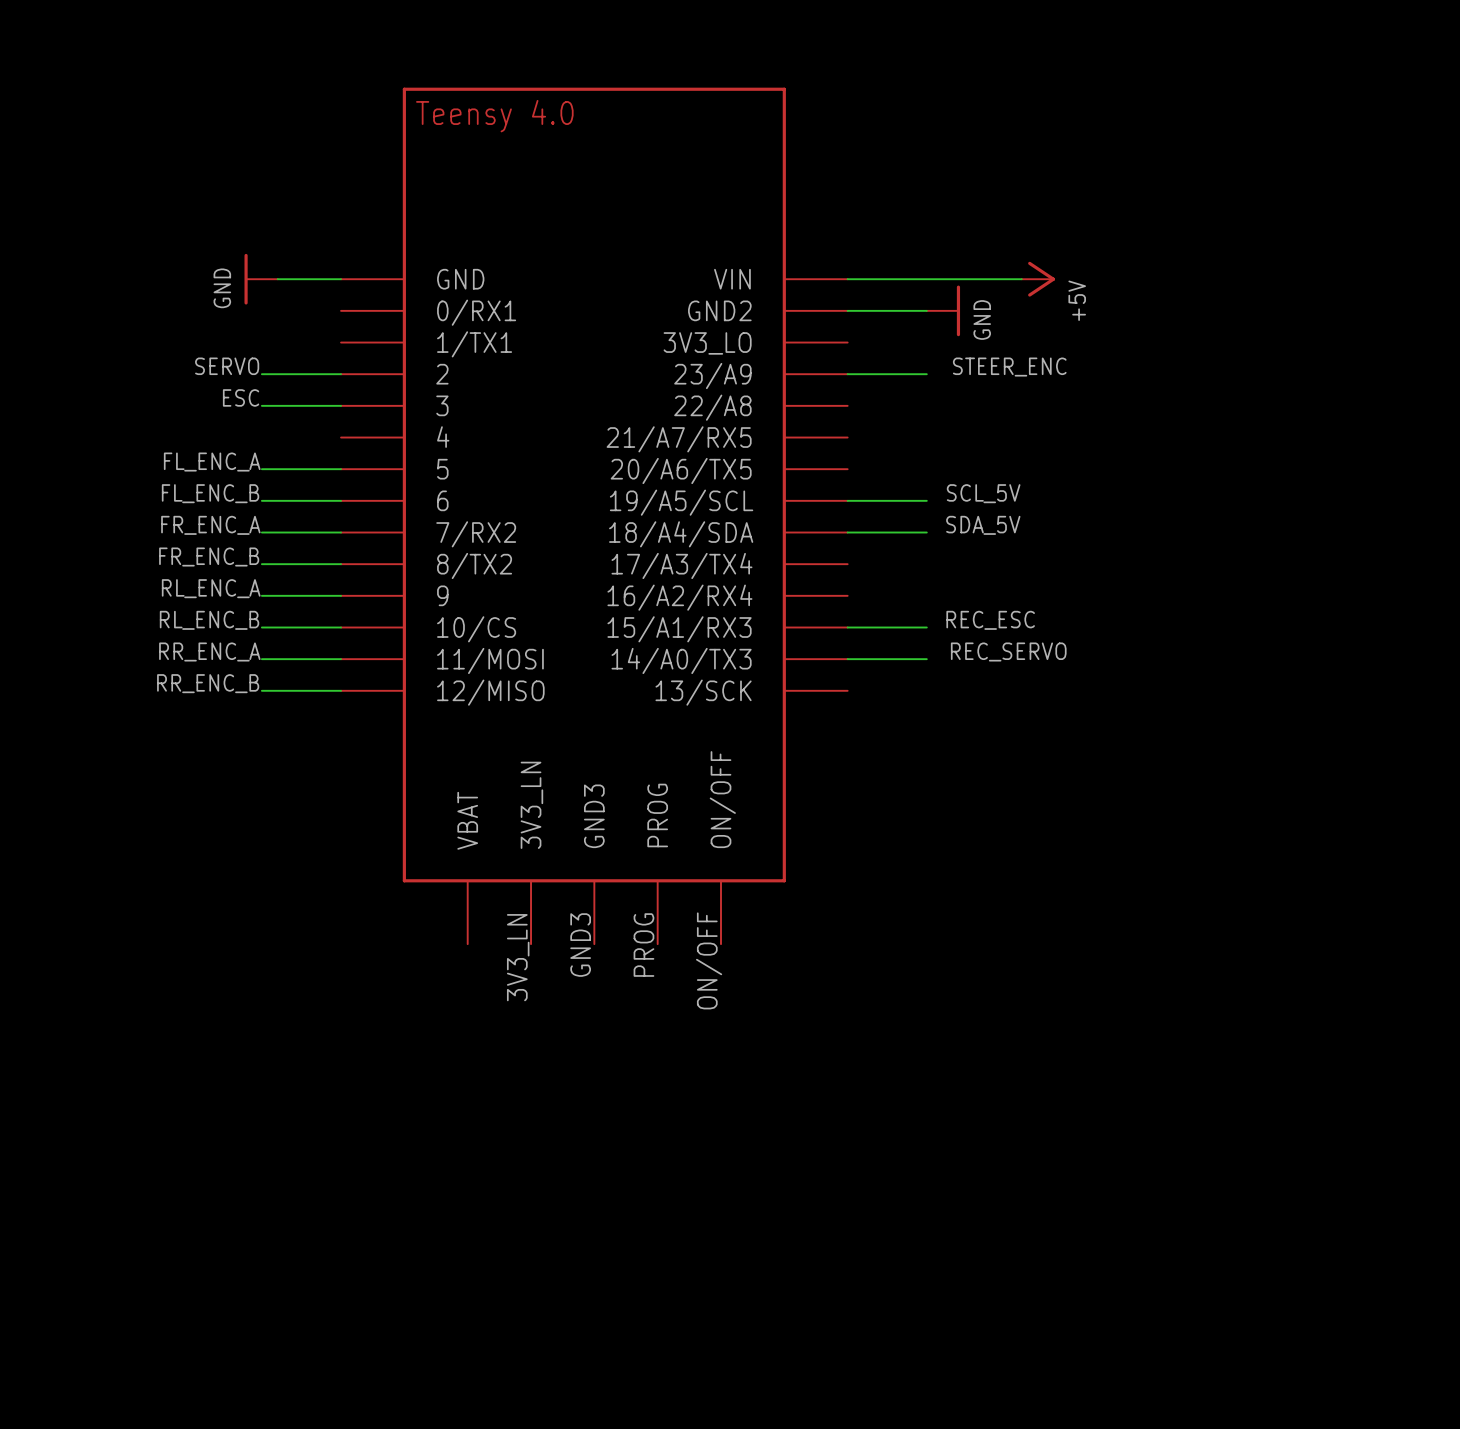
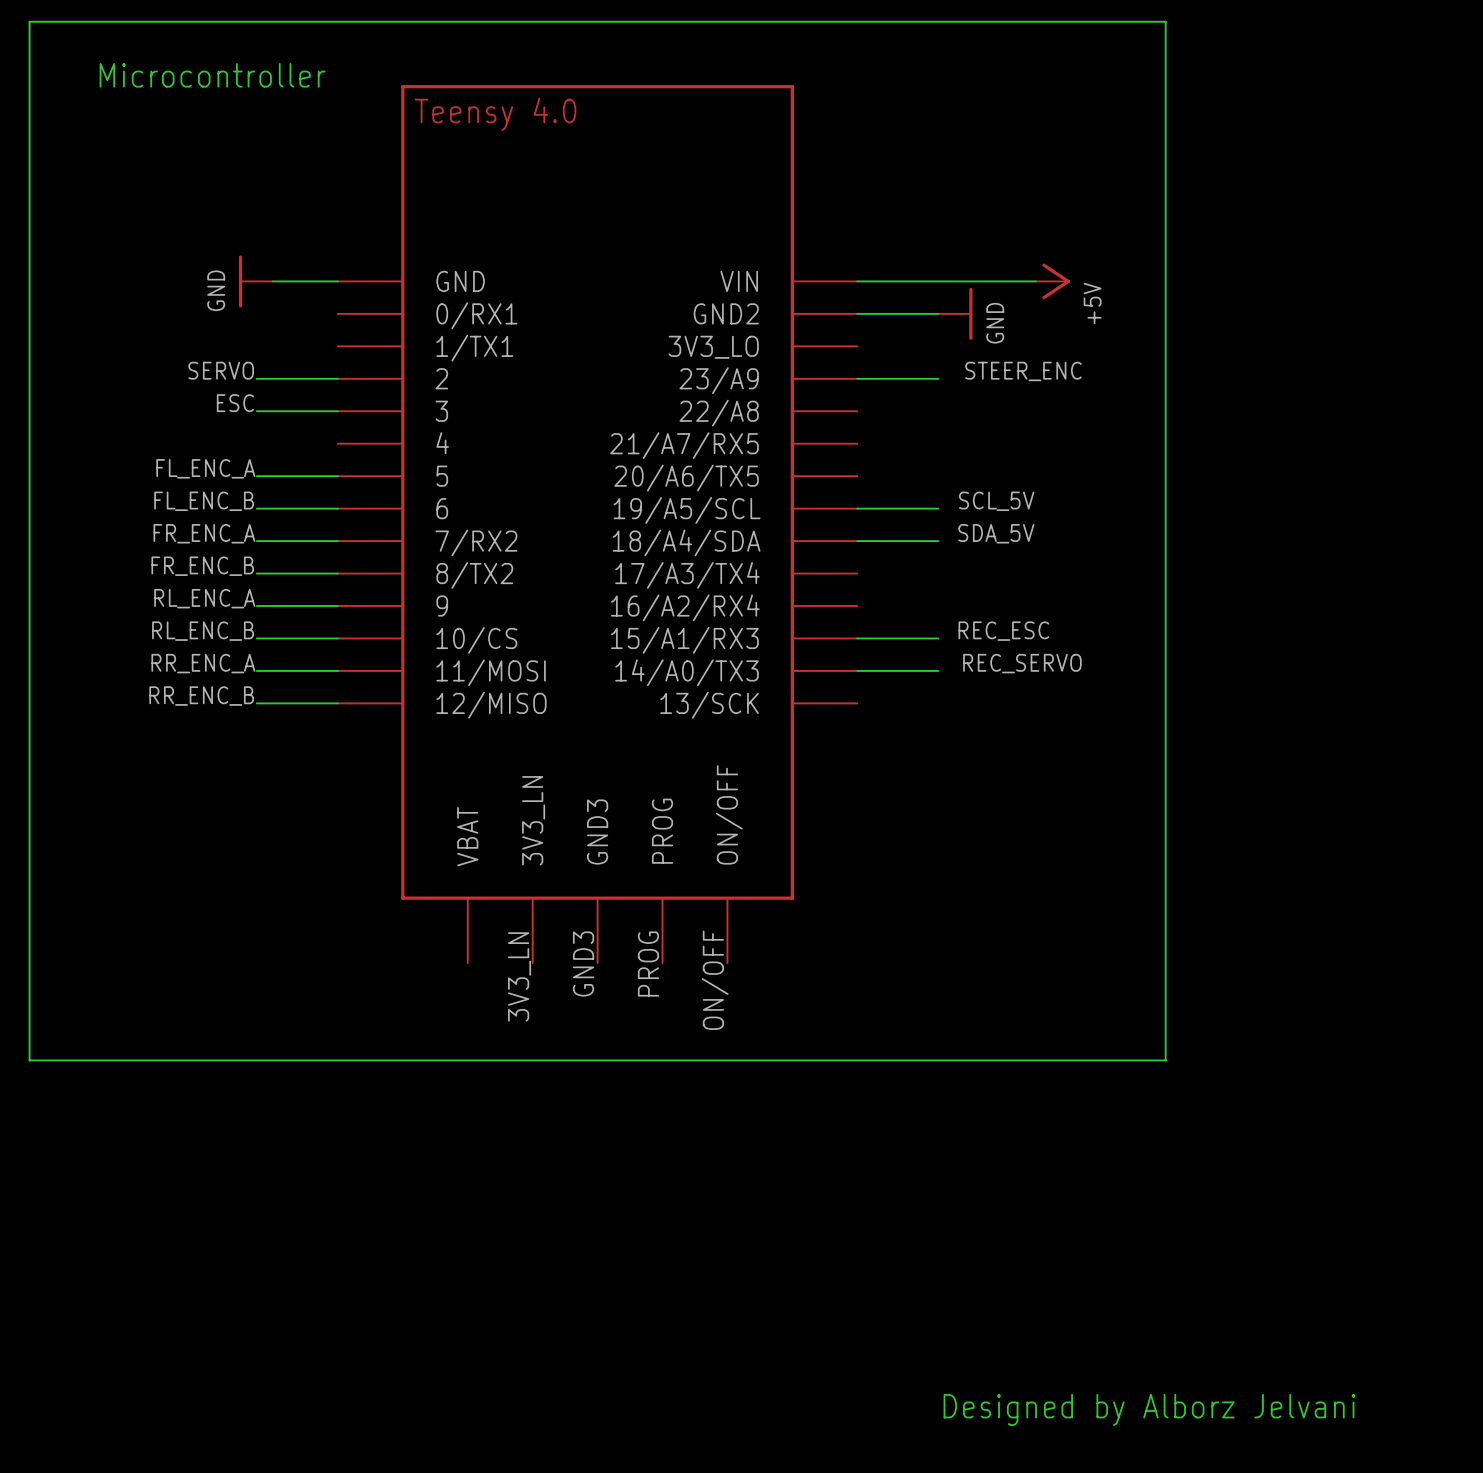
wire: none -> (29, 21) (29, 1060) (1165, 1060) (1165, 21) (29, 21)
text: none -> Microcontroller (212, 75)
text: none -> Designed by Alborz Jelvani (1149, 1409)

